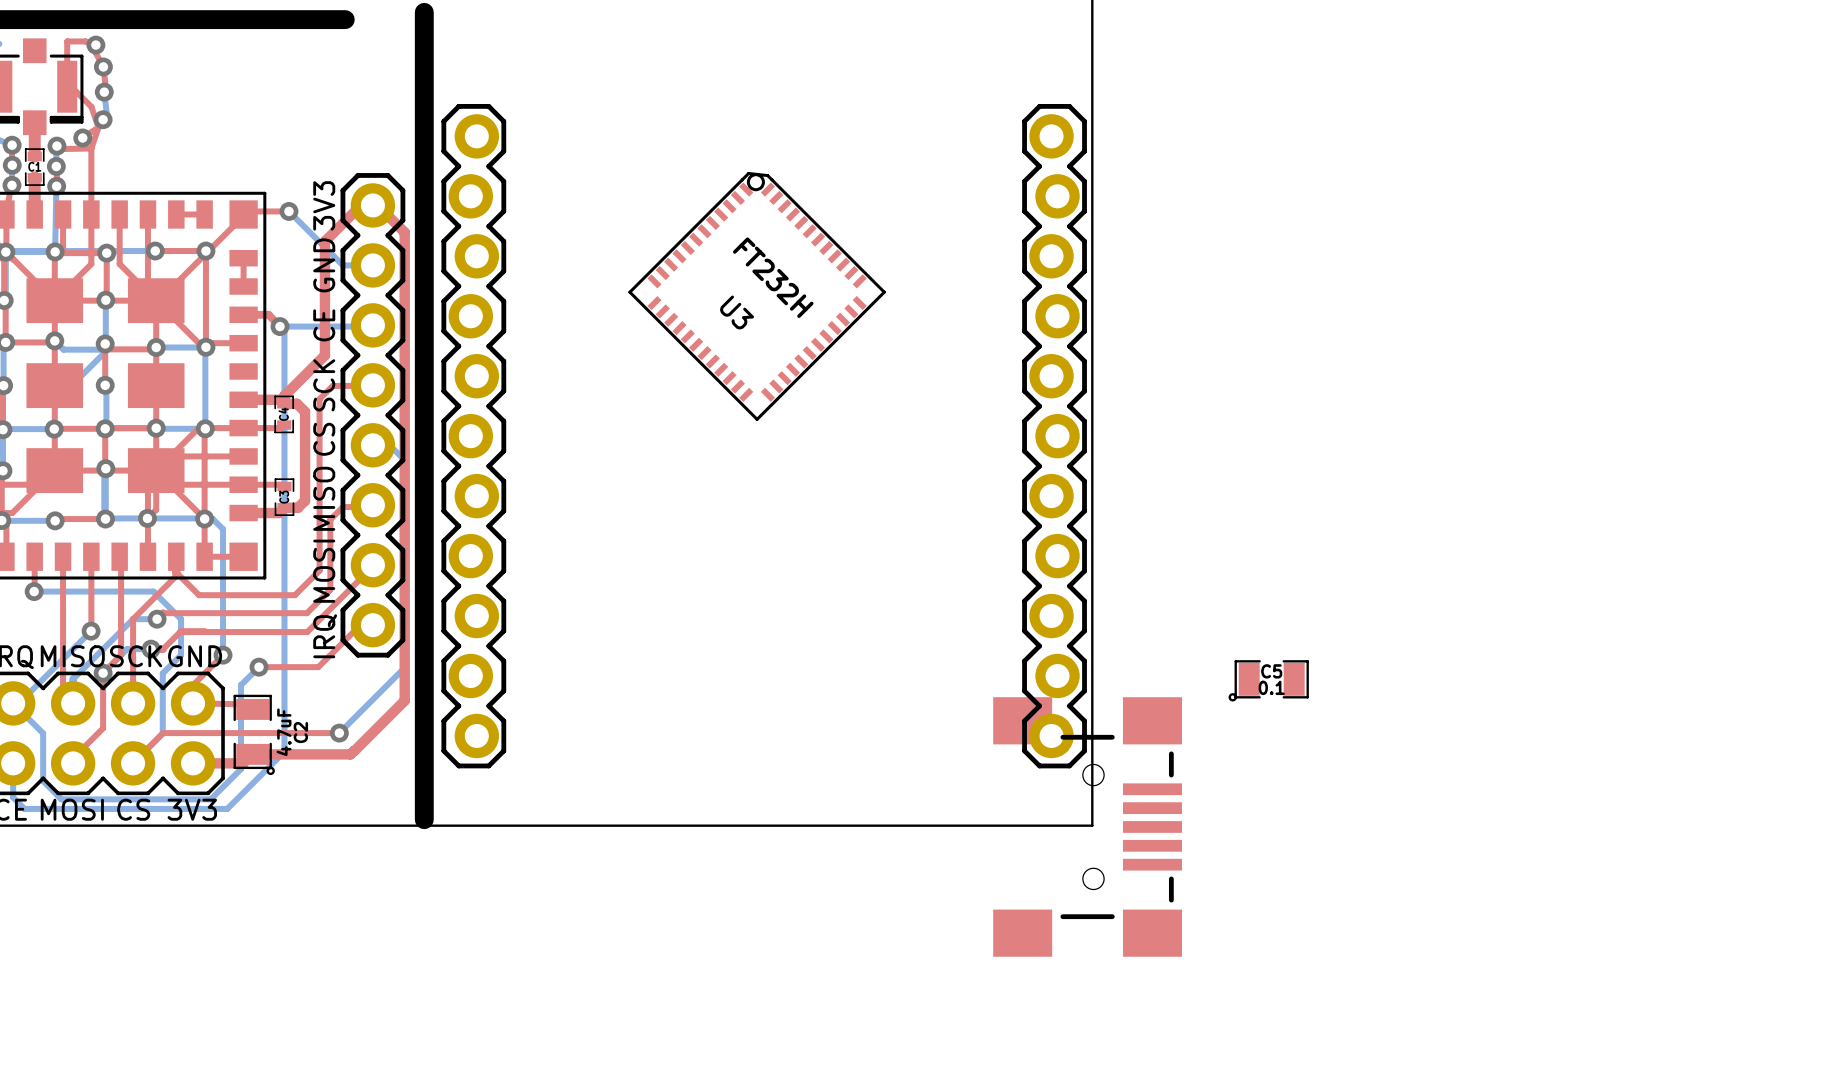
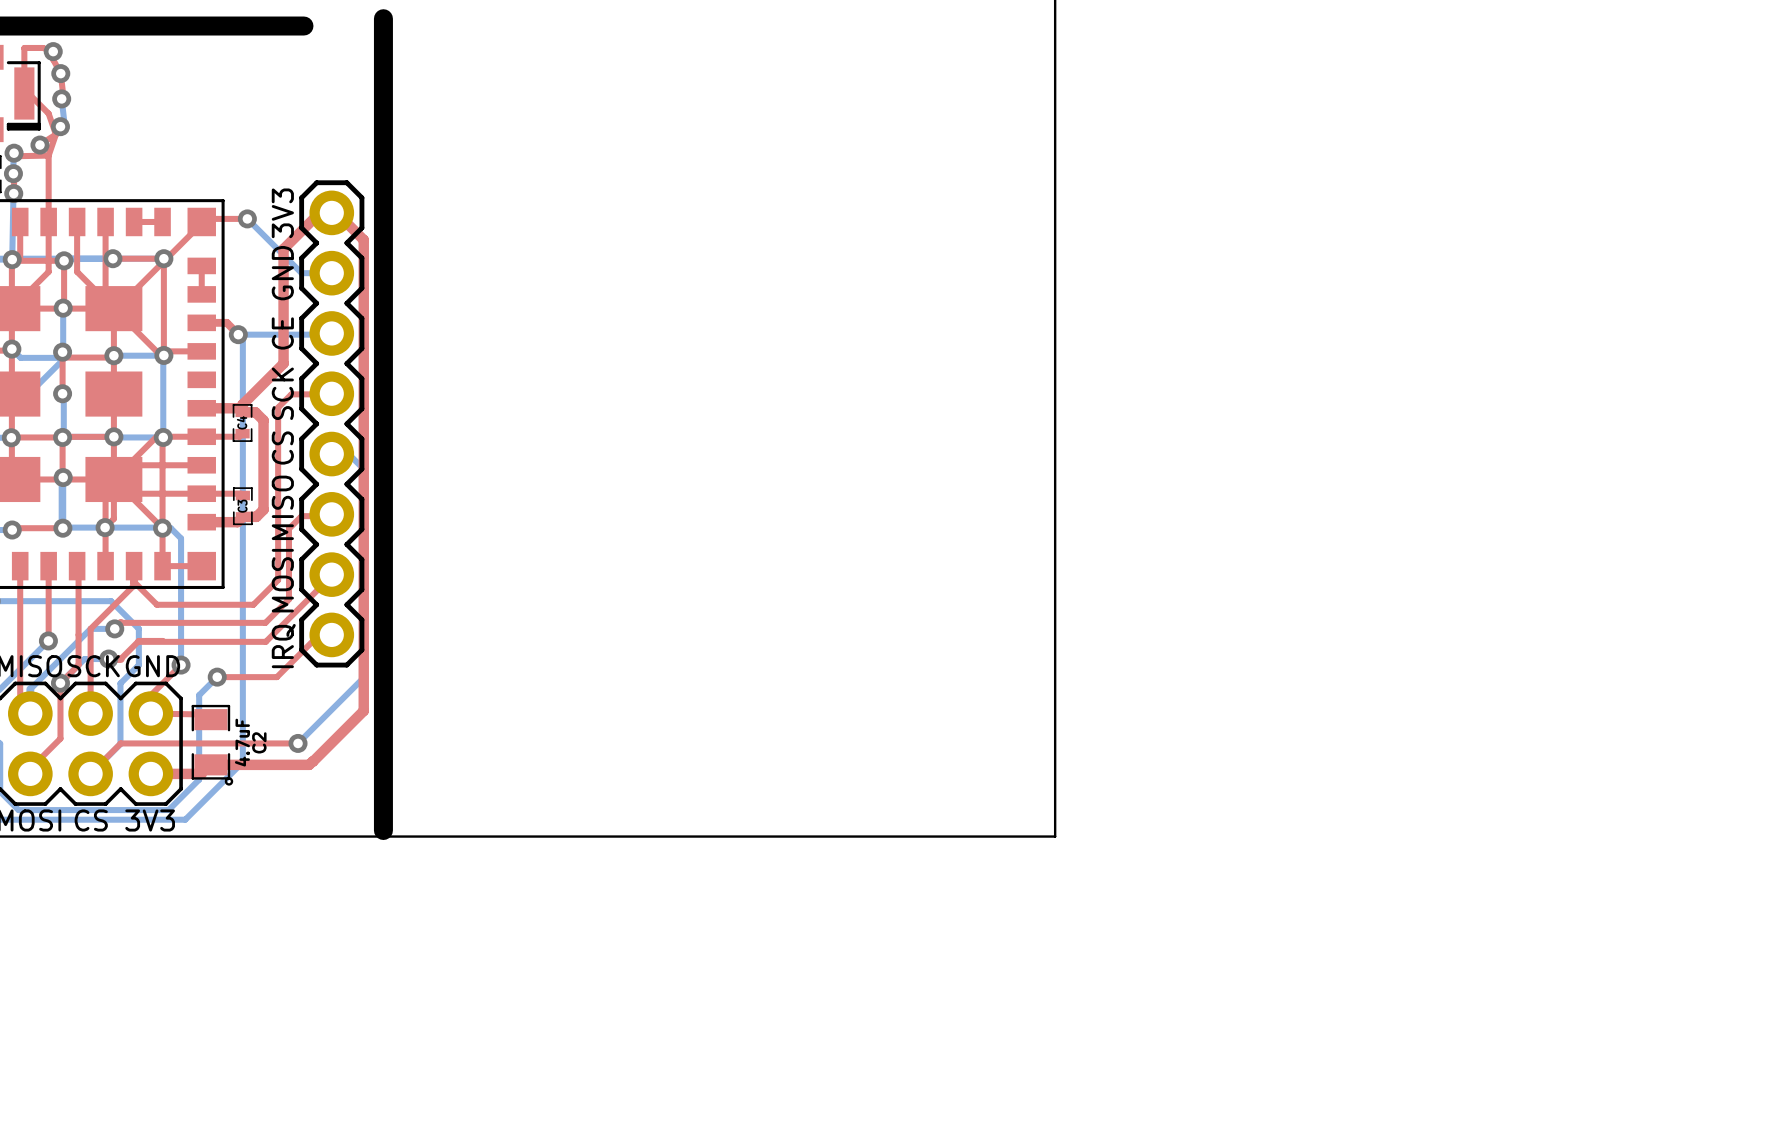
U3: FT232H (757, 296) -> none
part: (473, 436) -> none
part: (1054, 436) -> none
C5: 0.1 (1268, 680) -> none
part: (1087, 826) -> none

